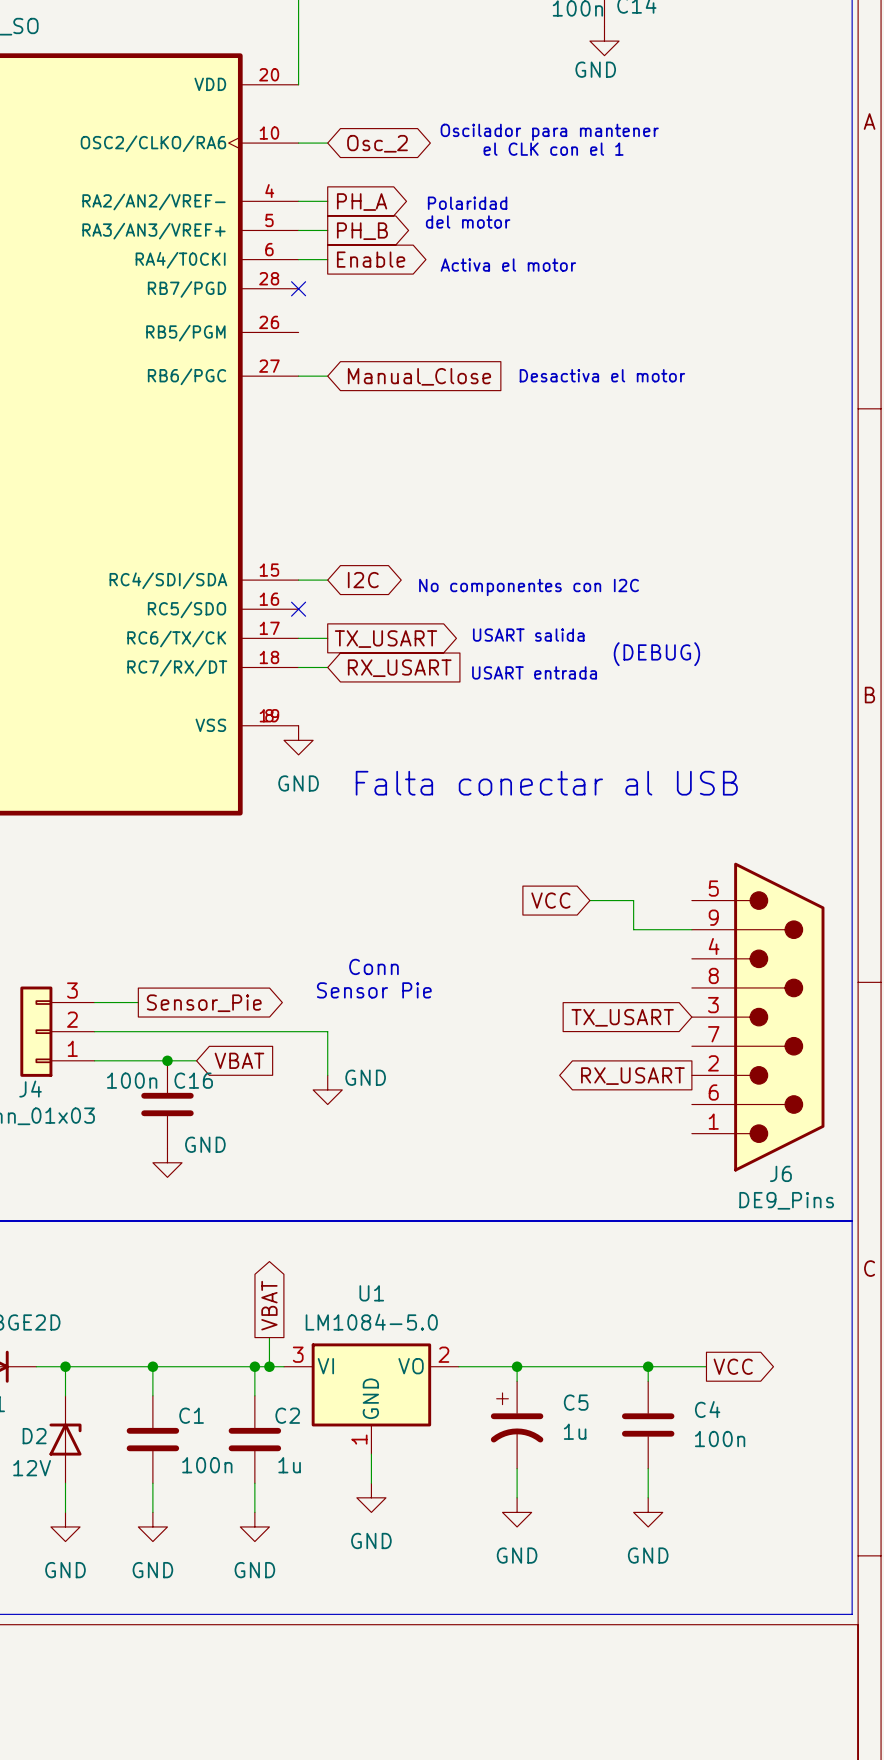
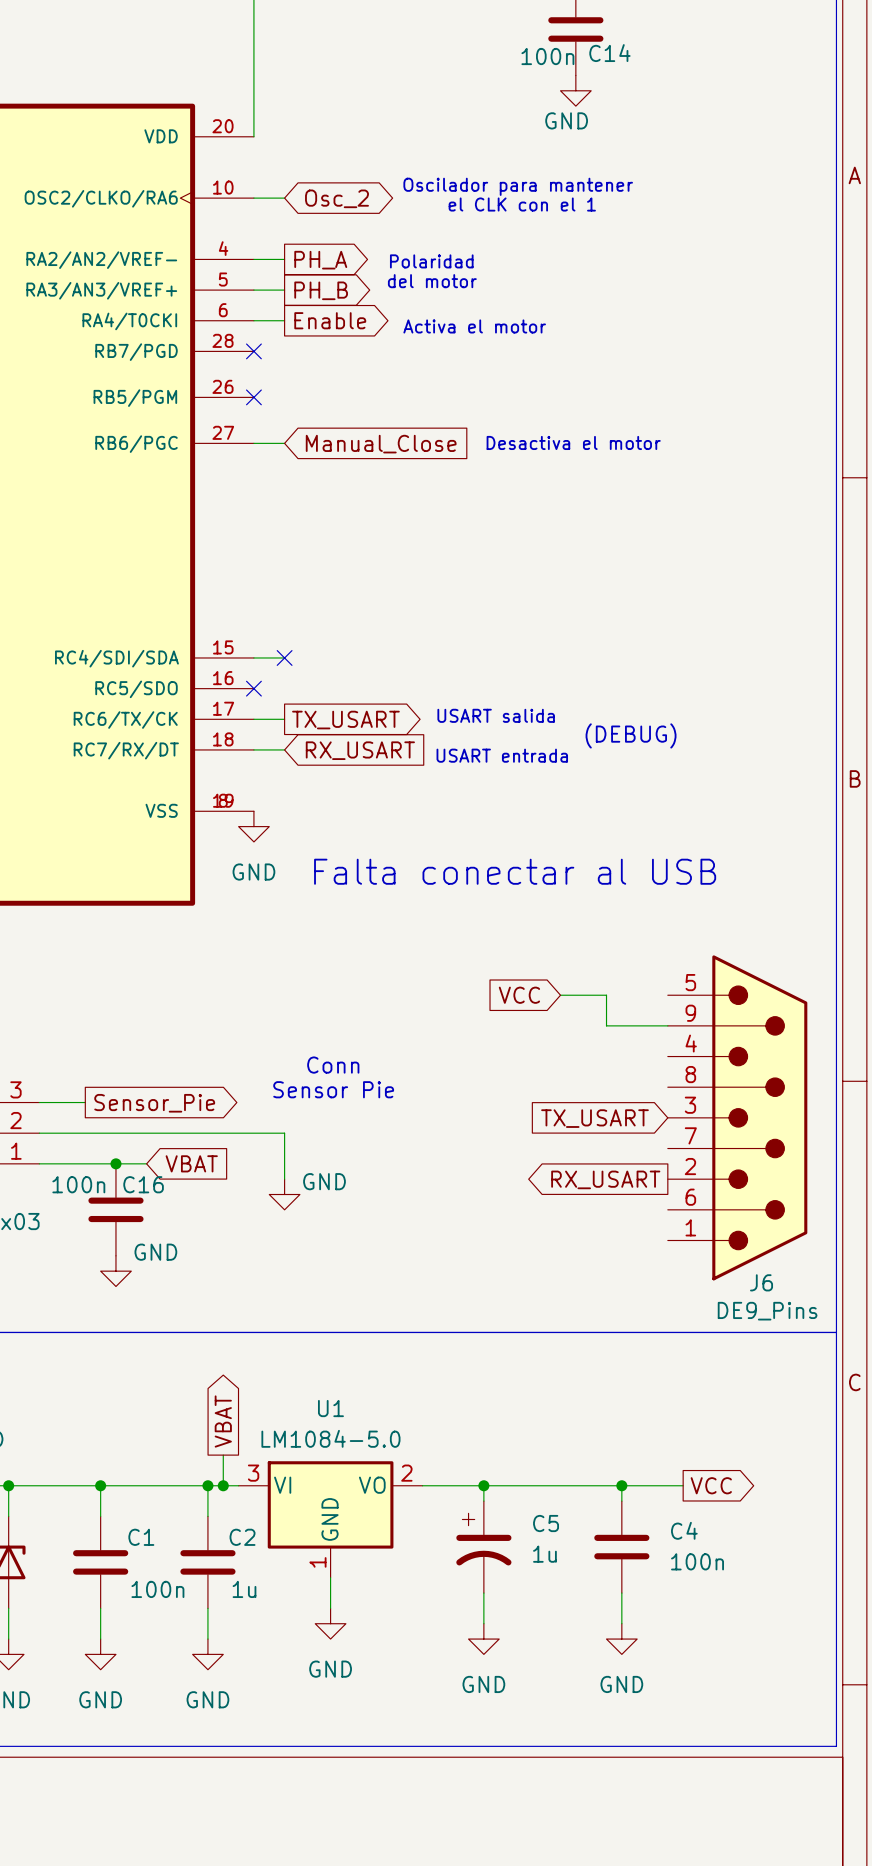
no-connect mark: none -> (253, 397)
no-connect mark: none -> (284, 657)
global label: I2C (363, 580) -> none
text: No componentes con I2C (529, 587) -> none

